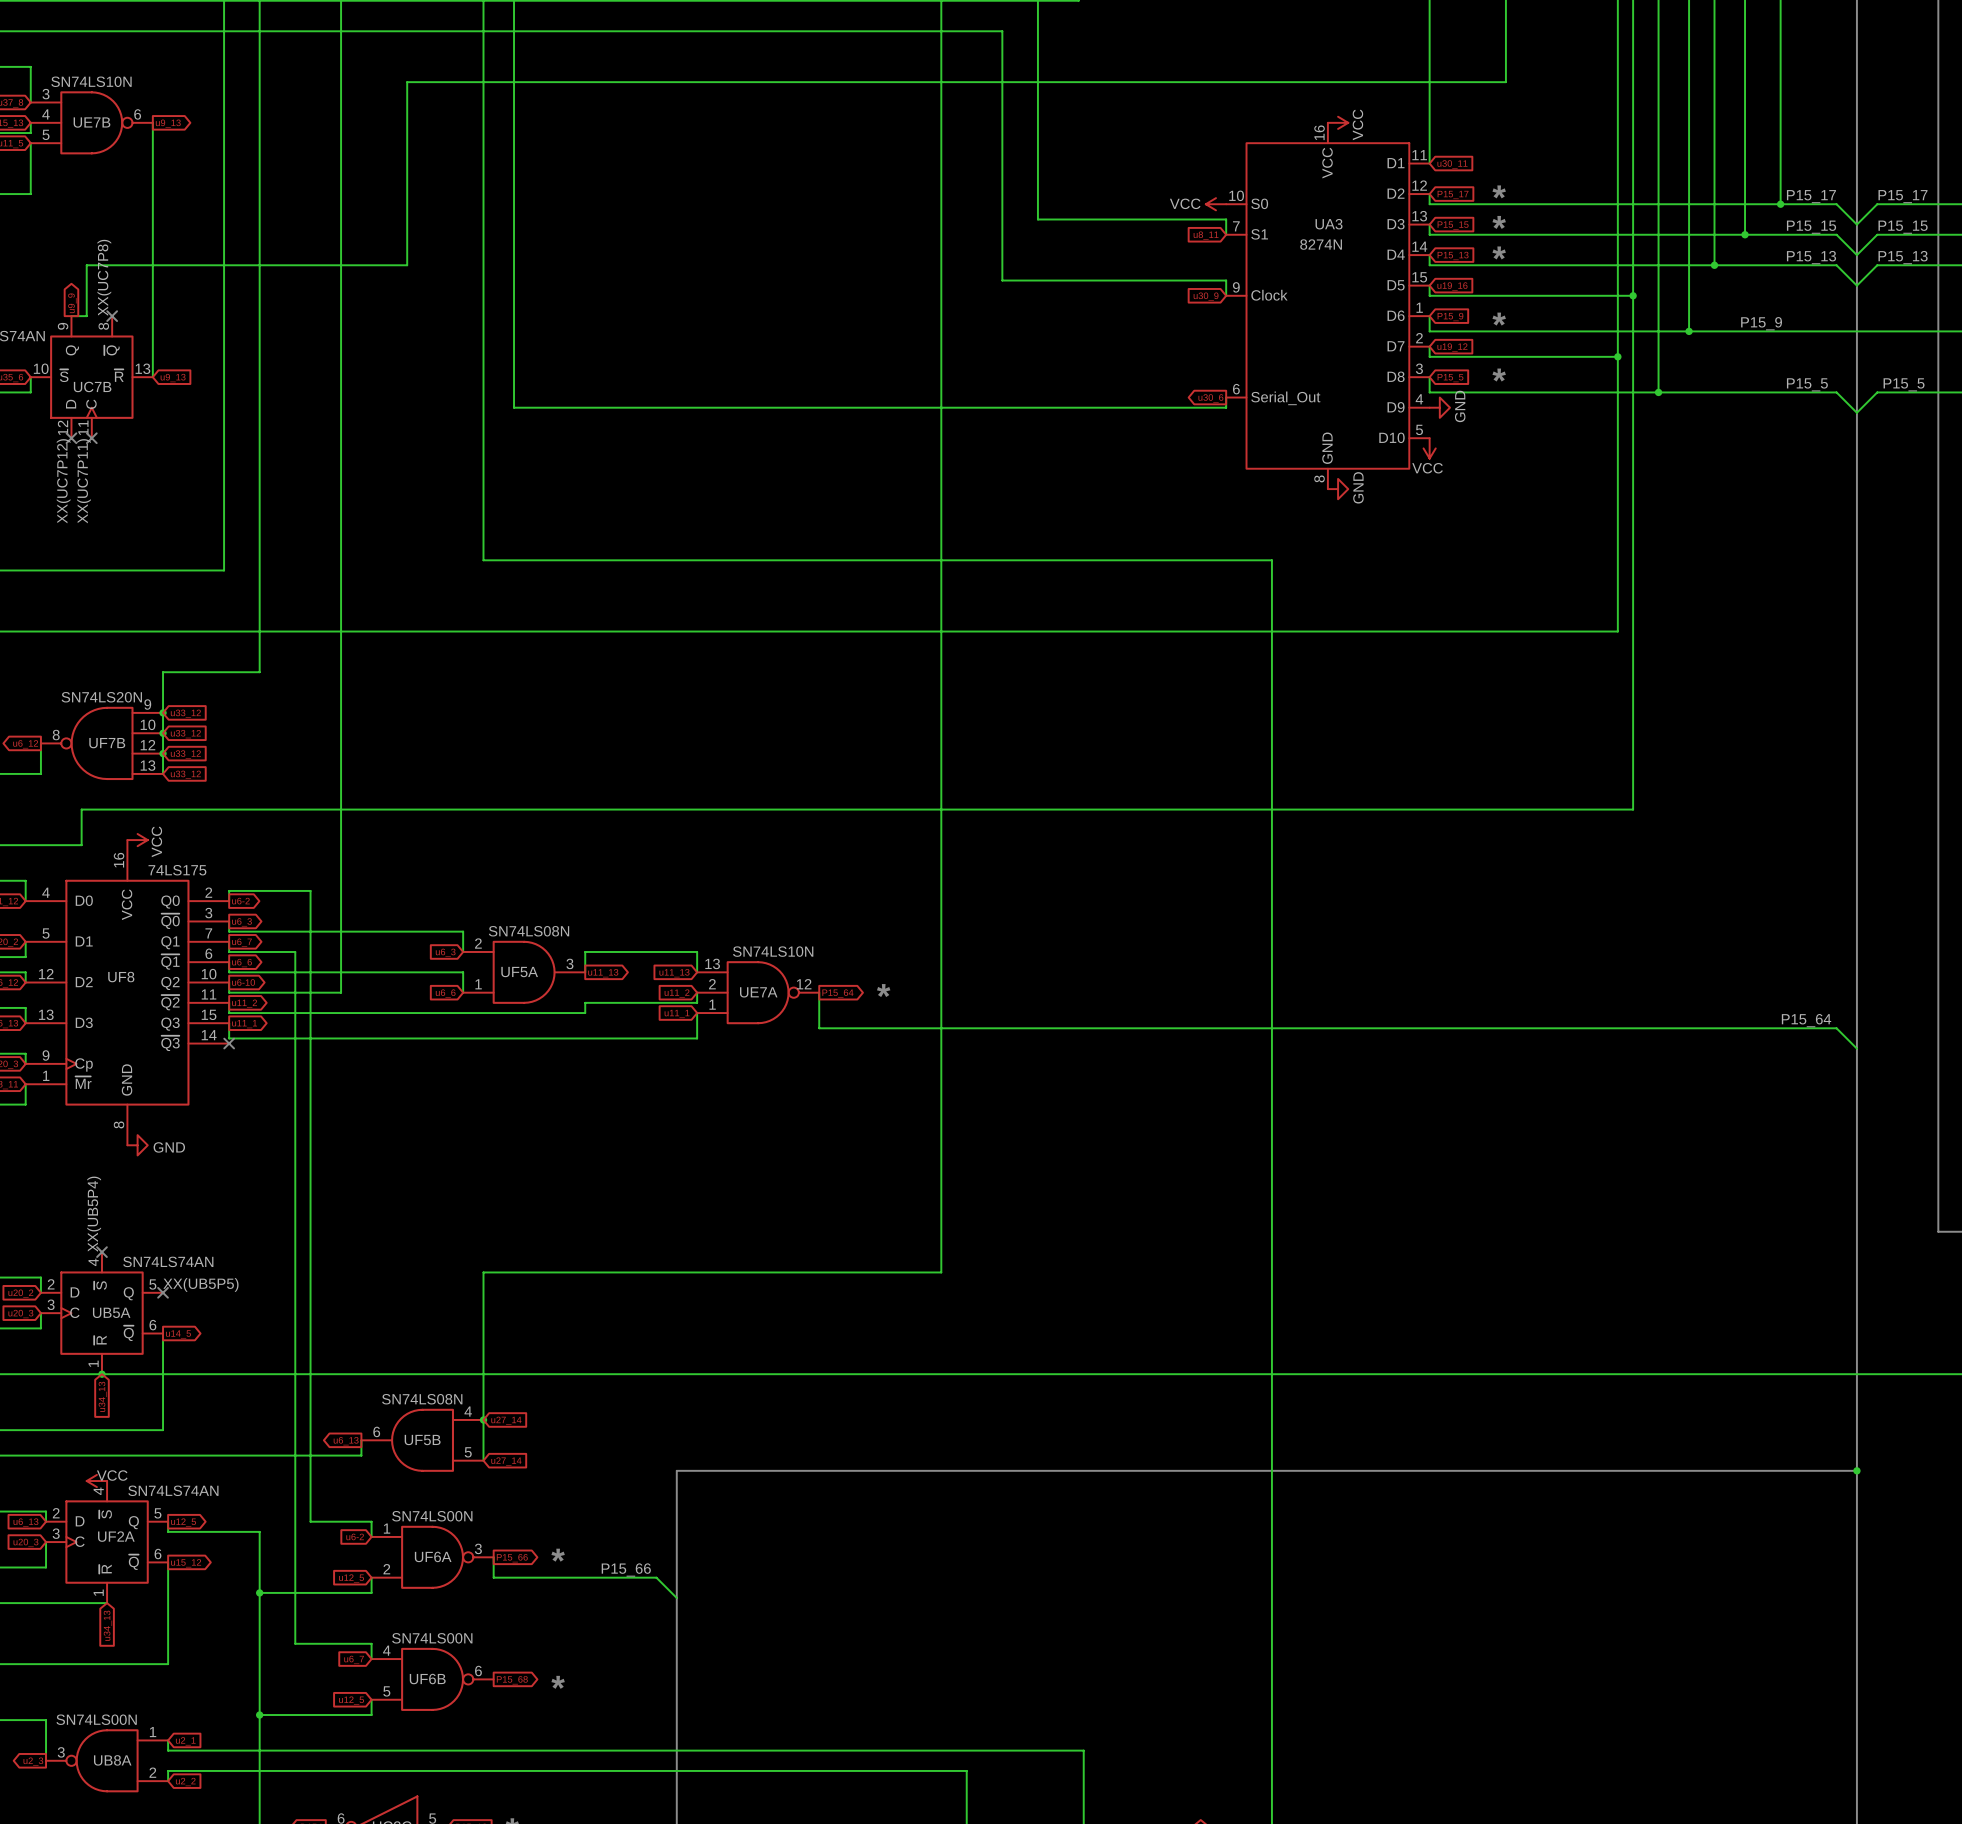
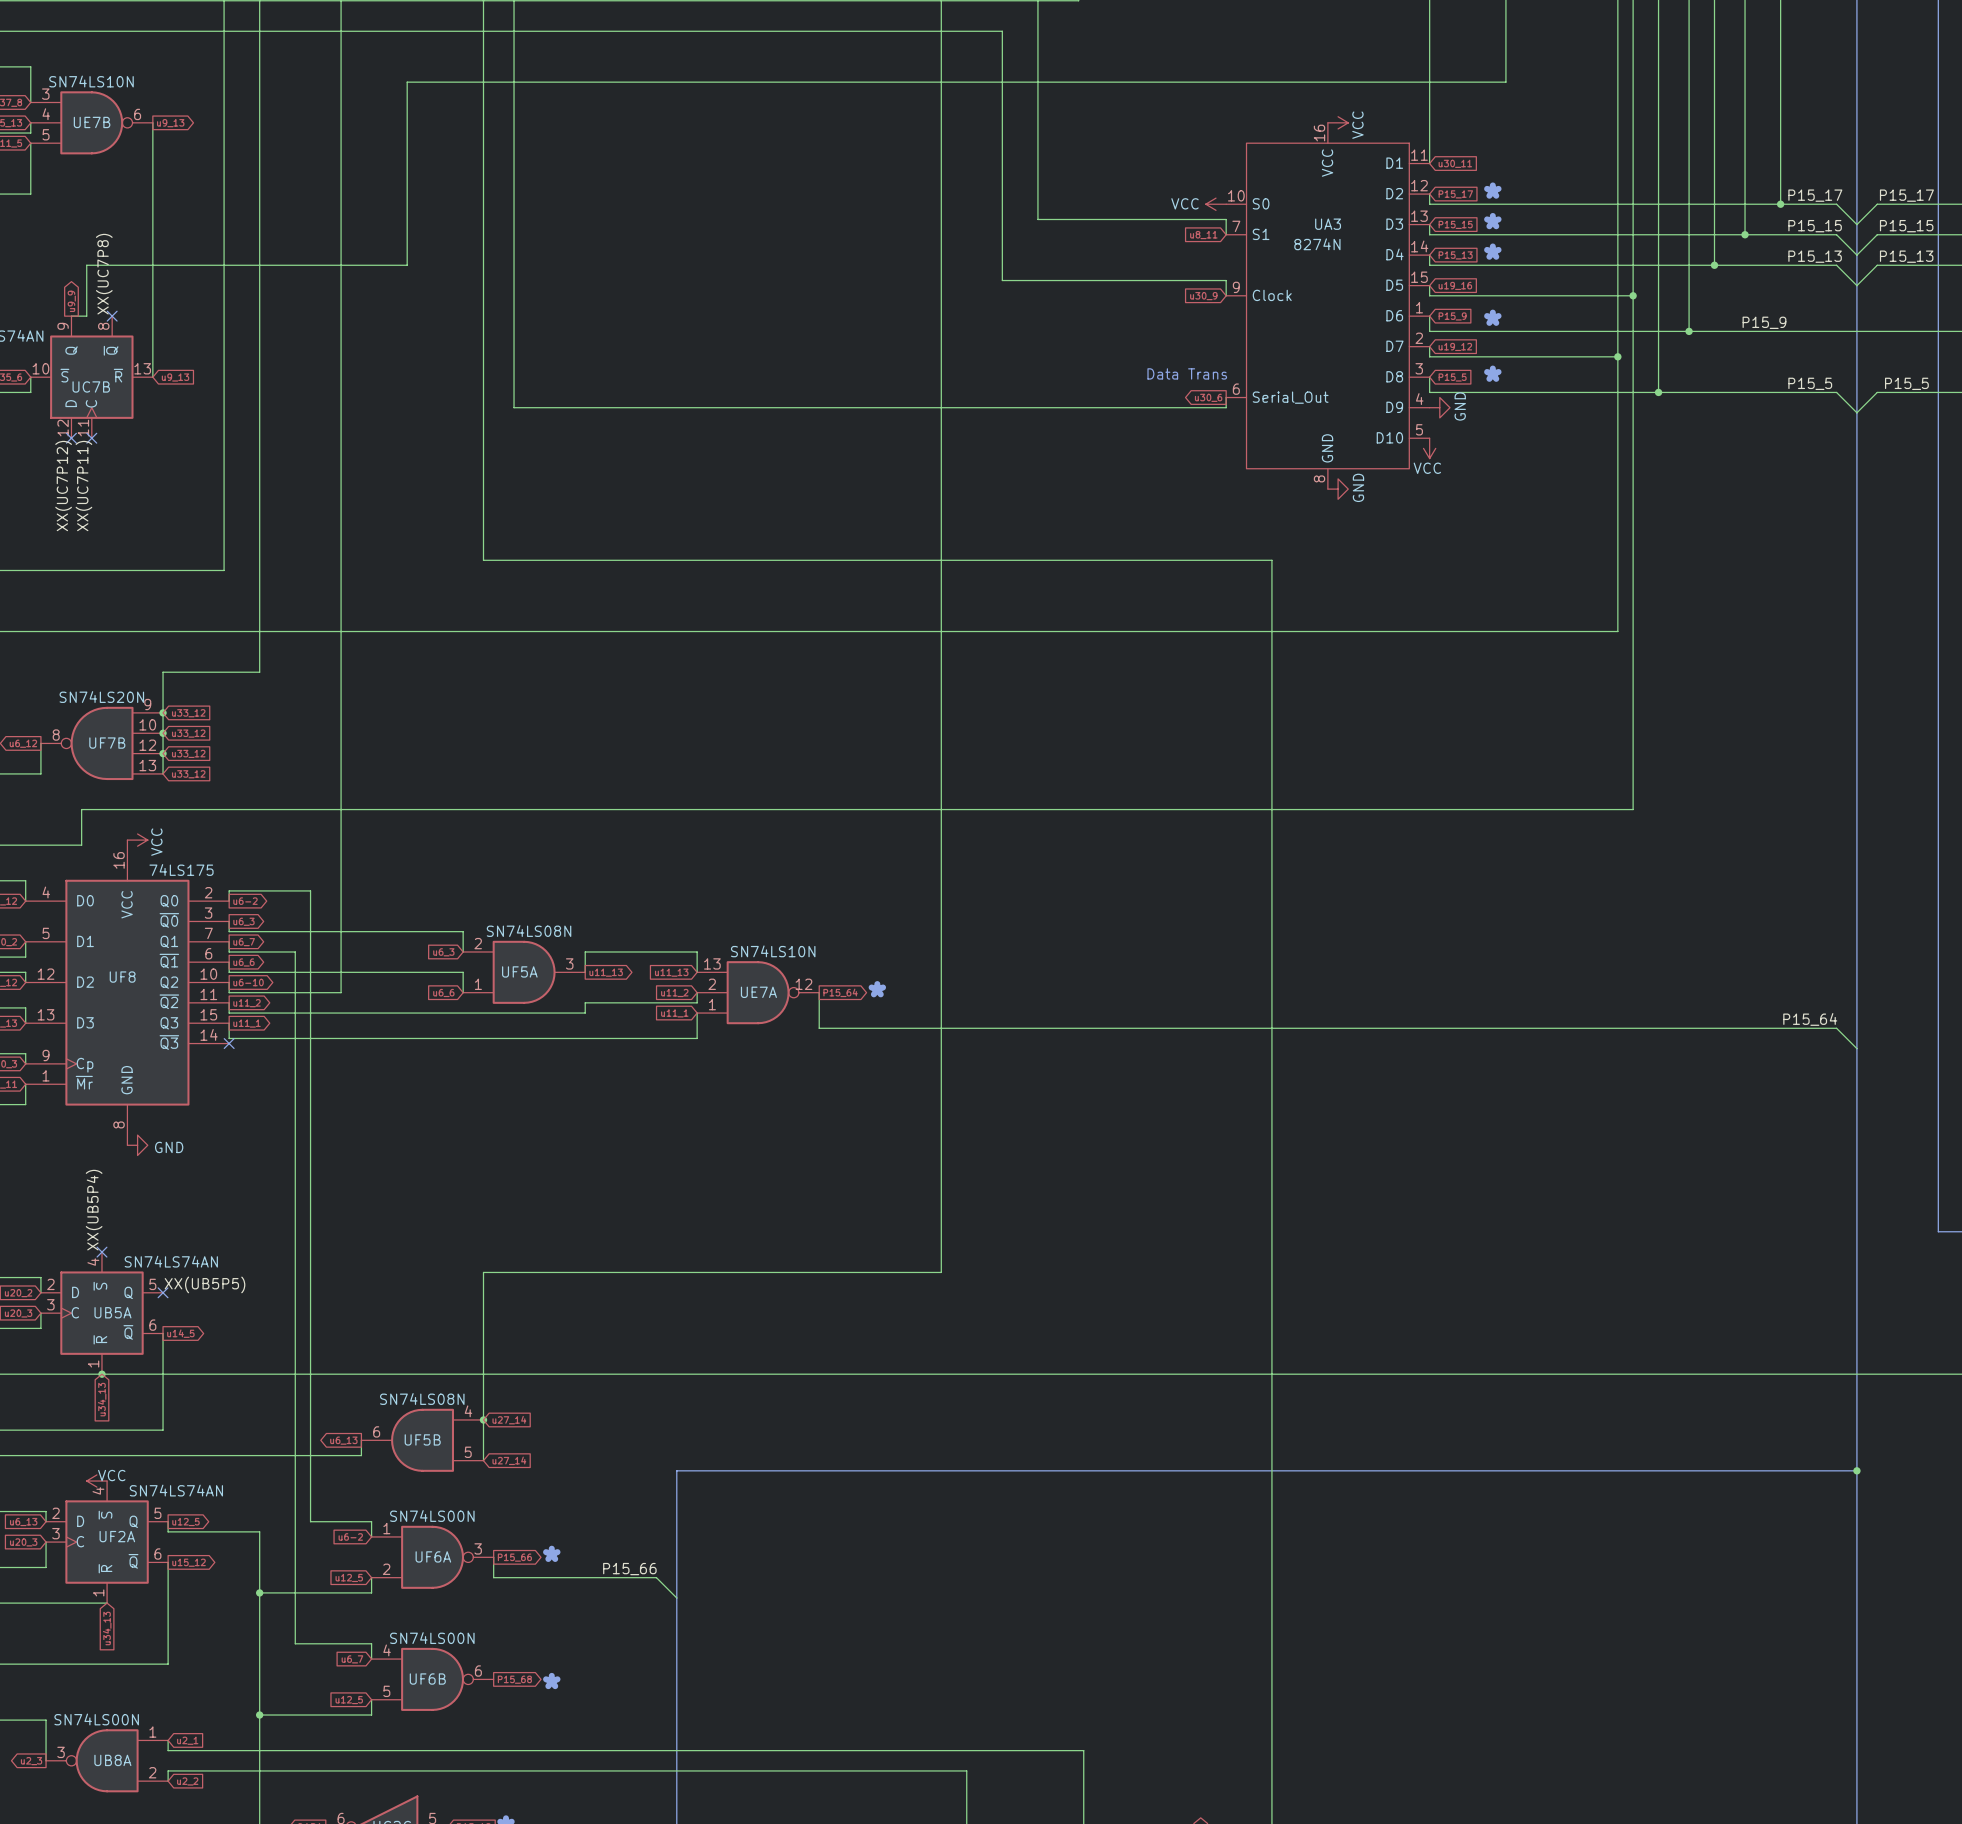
text: none -> Data Trans (1187, 373)

